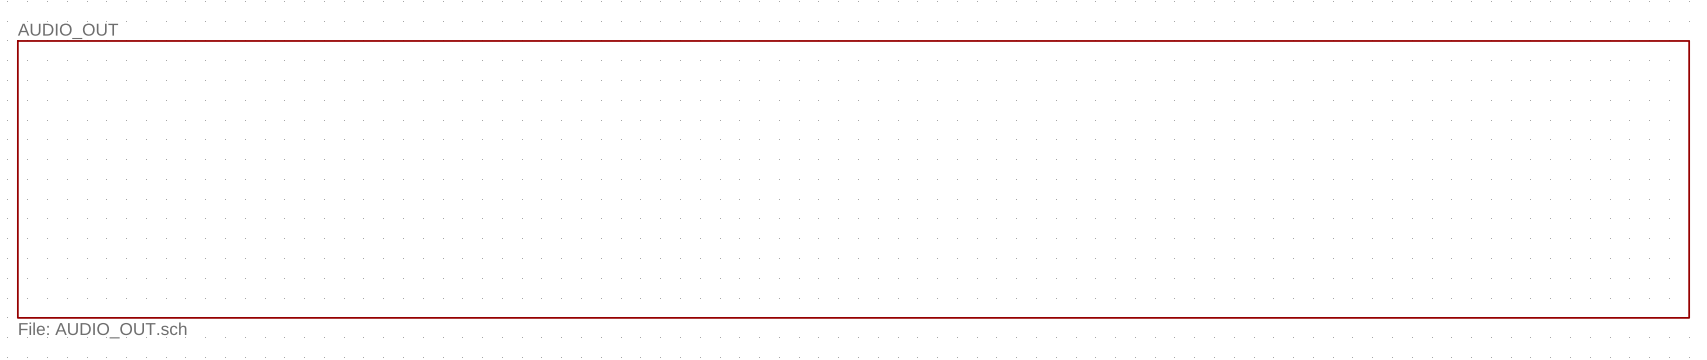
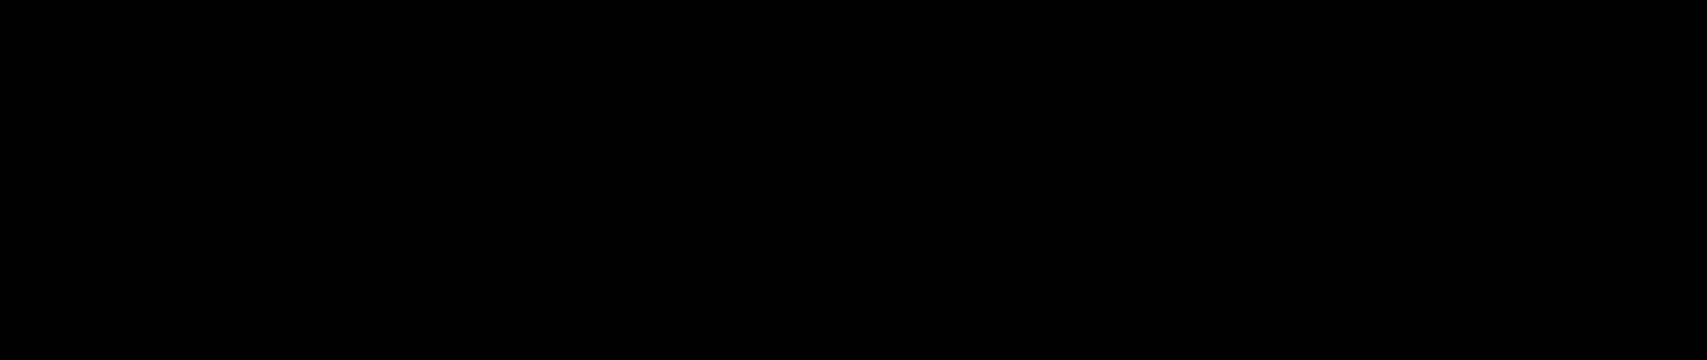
sheet AUDIO_OUT: File: AUDIO_OUT.sch (853, 179) -> none

